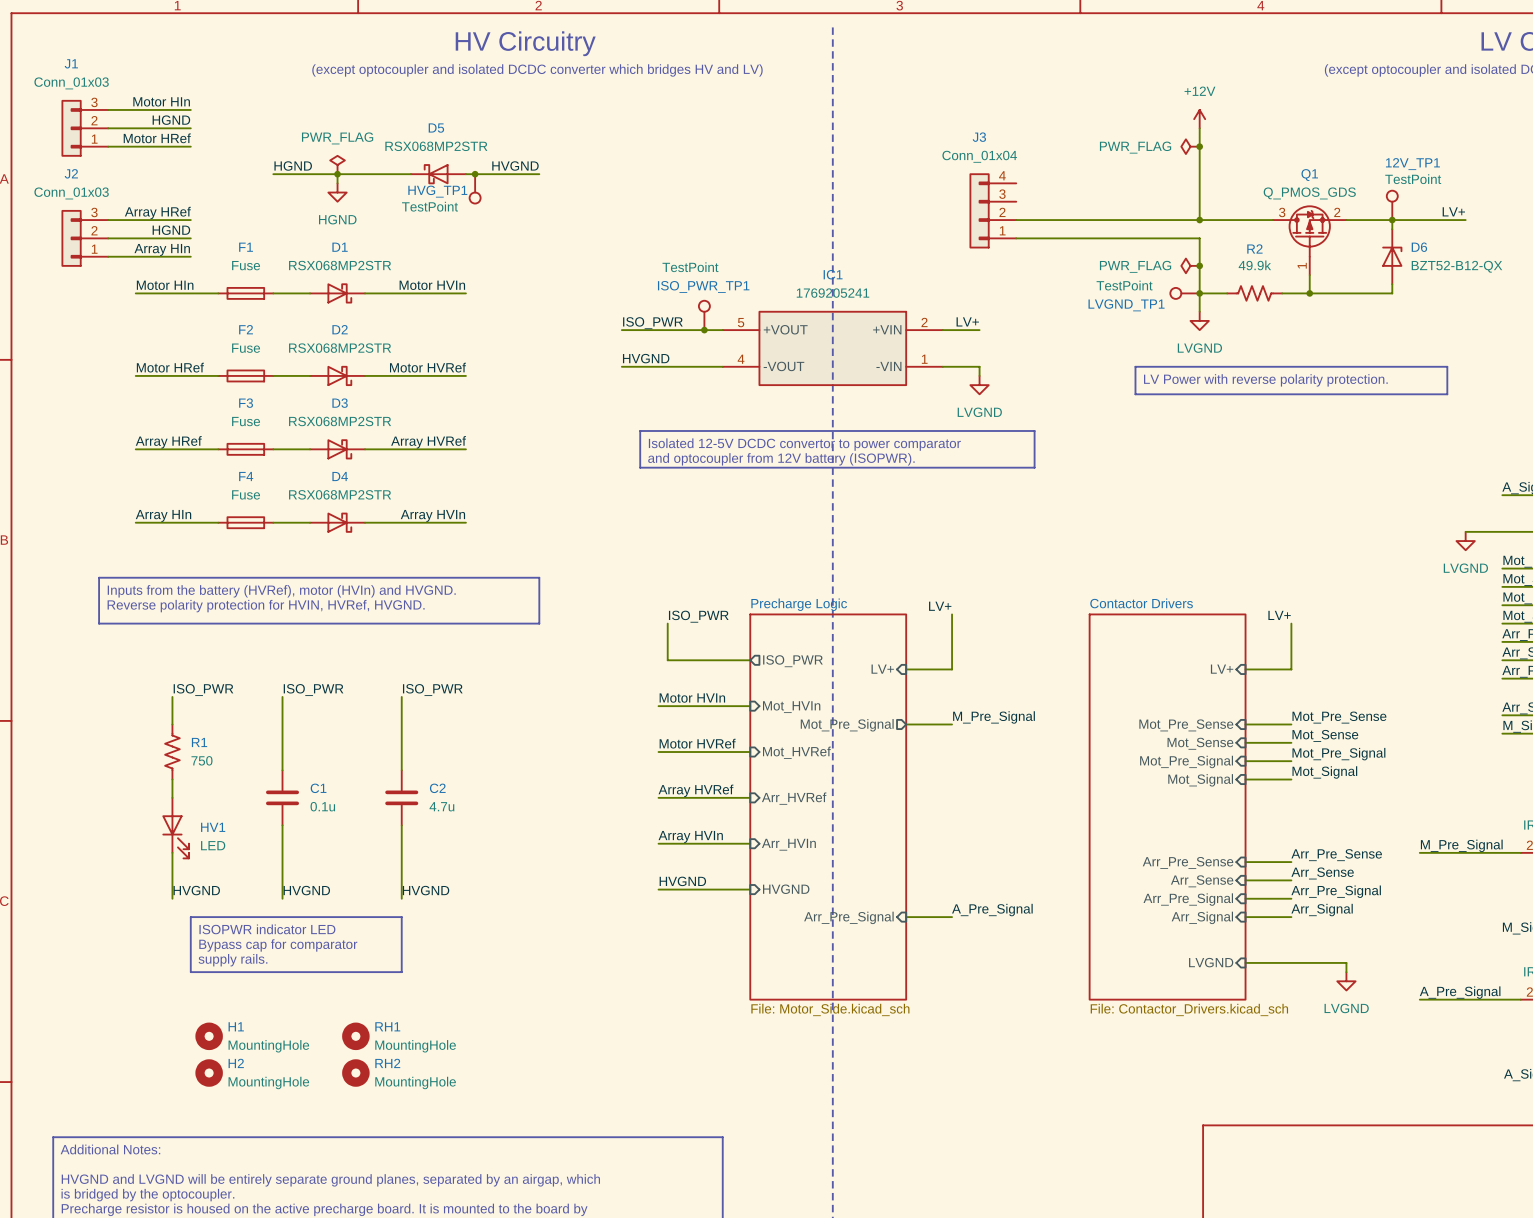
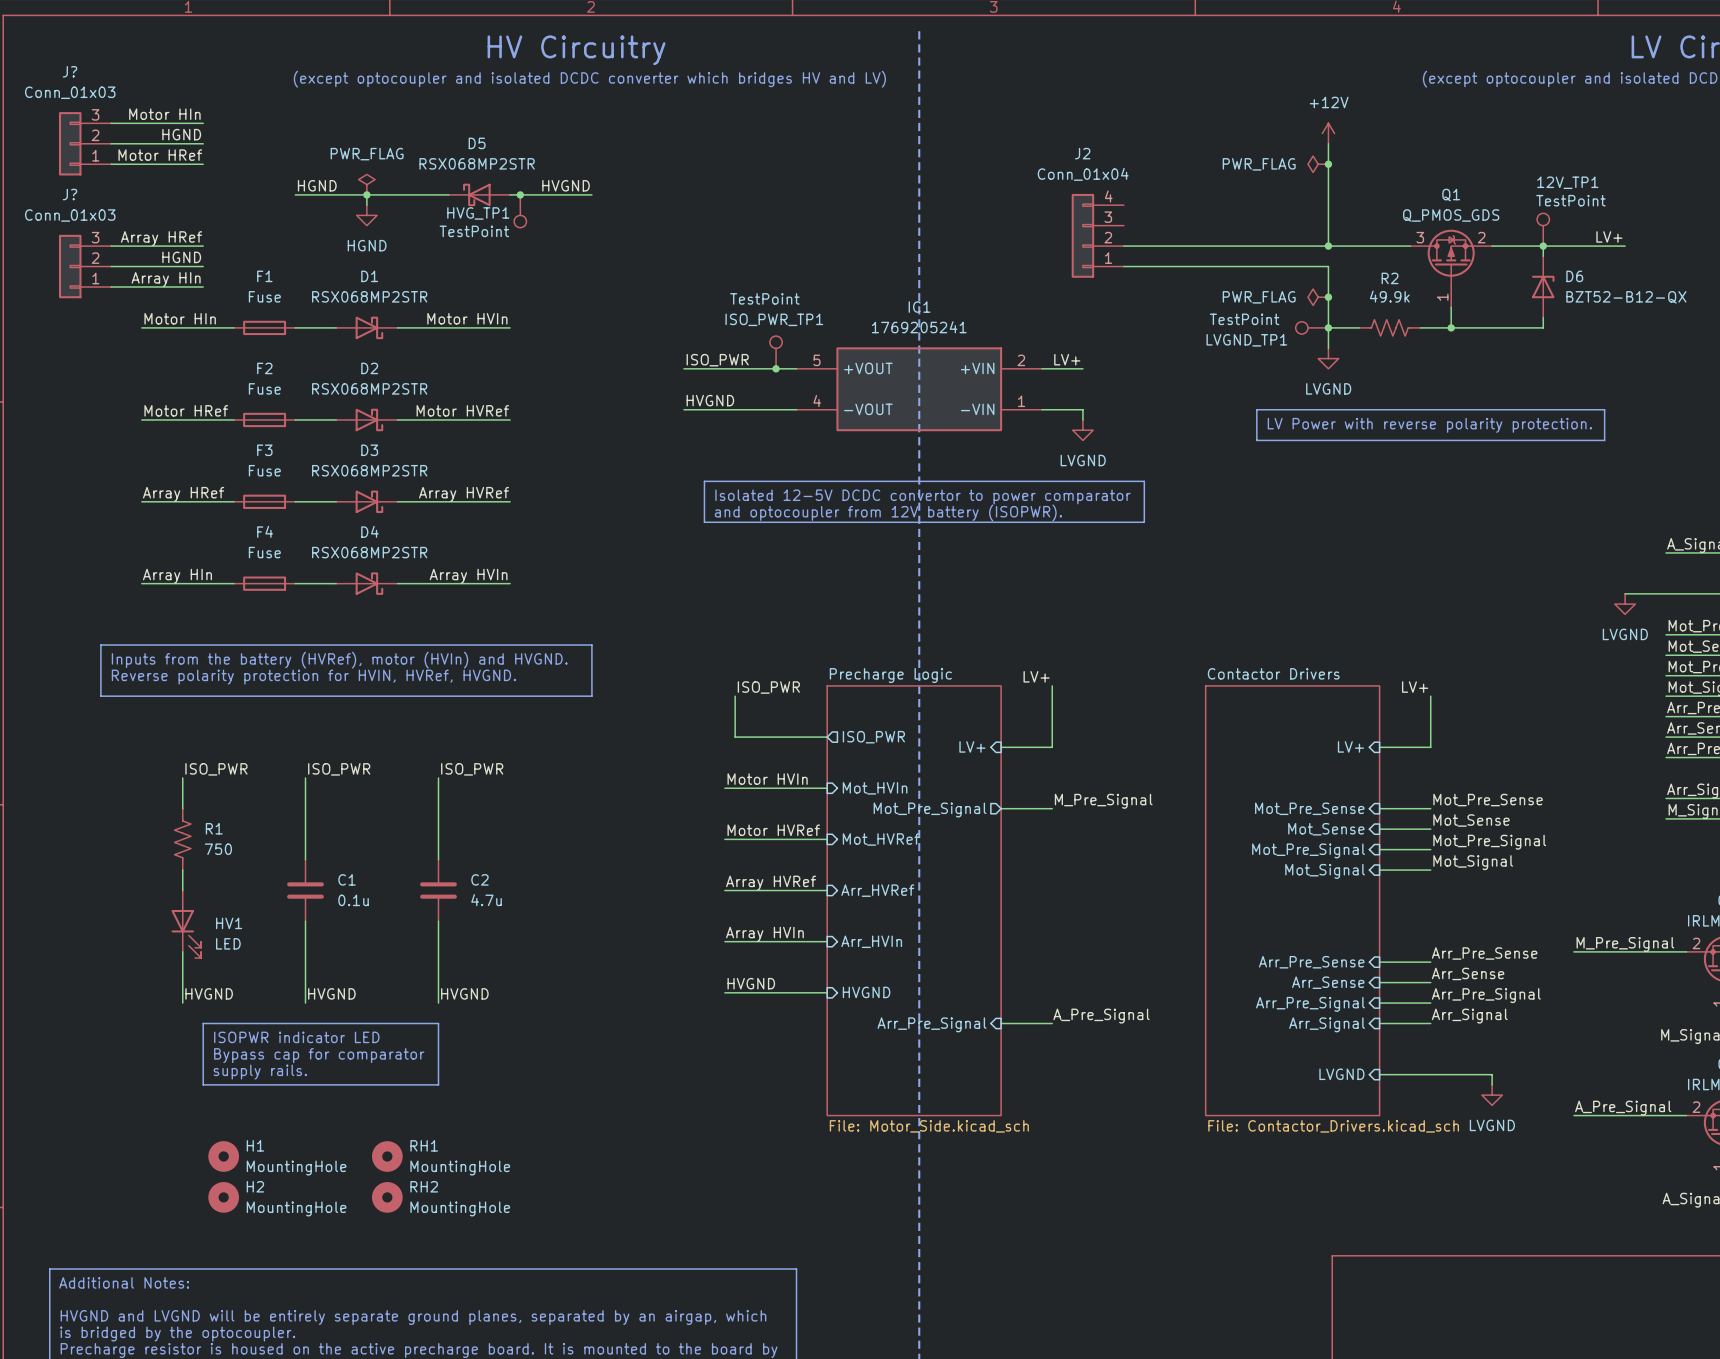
J1 name: J1 (71, 63) -> J? (69, 71)
J3 name: J3 (979, 137) -> J2 (1082, 153)
J2 name: J2 (71, 173) -> J? (69, 194)

